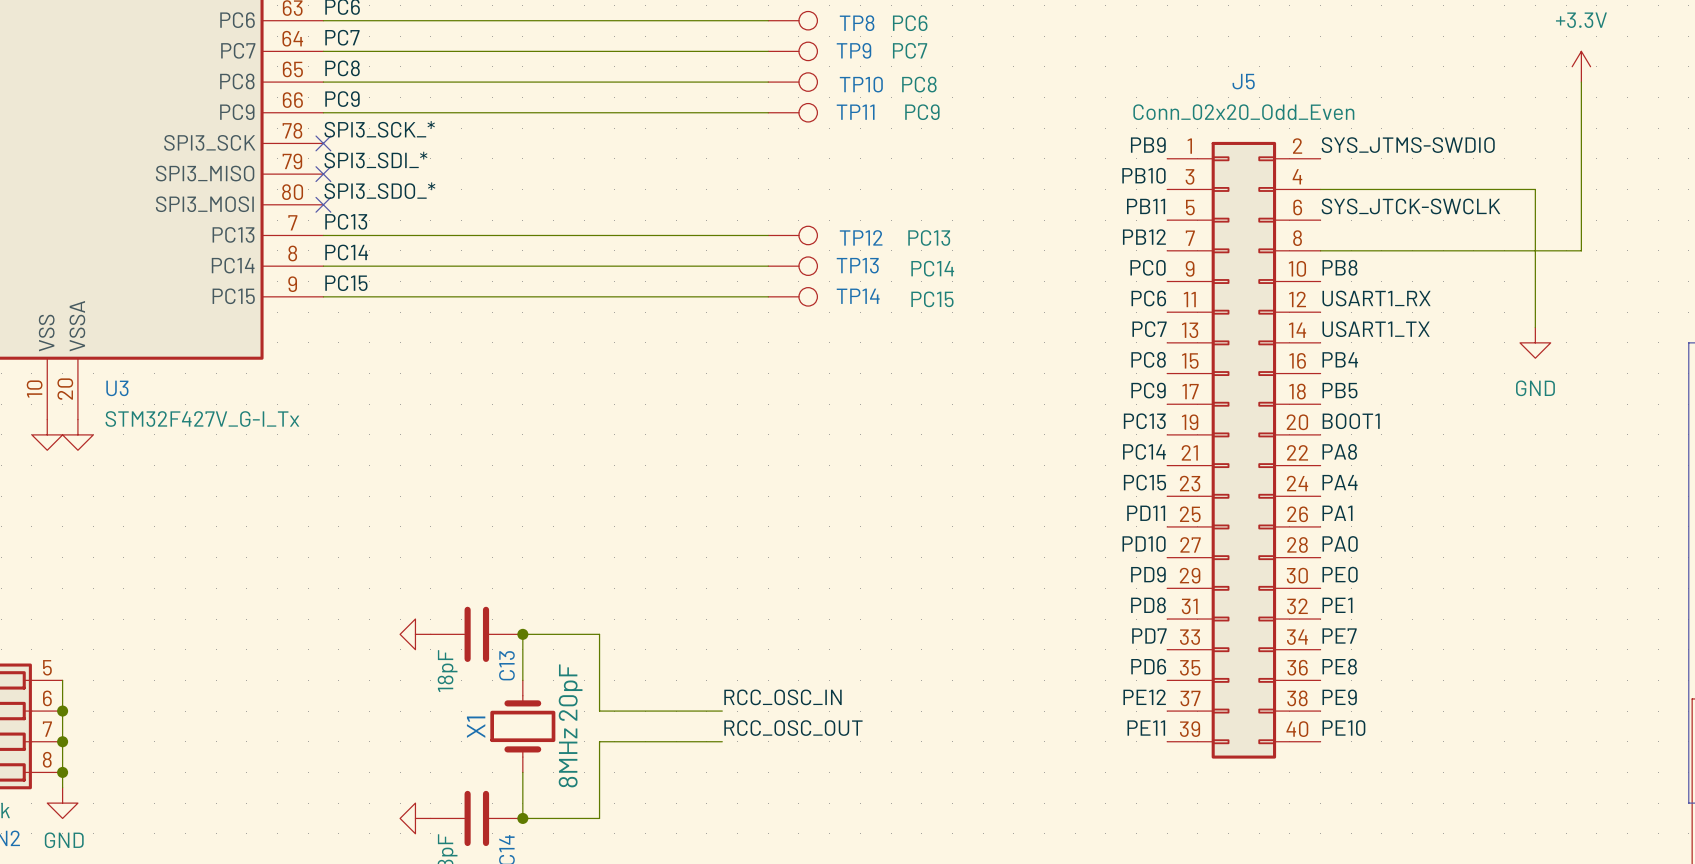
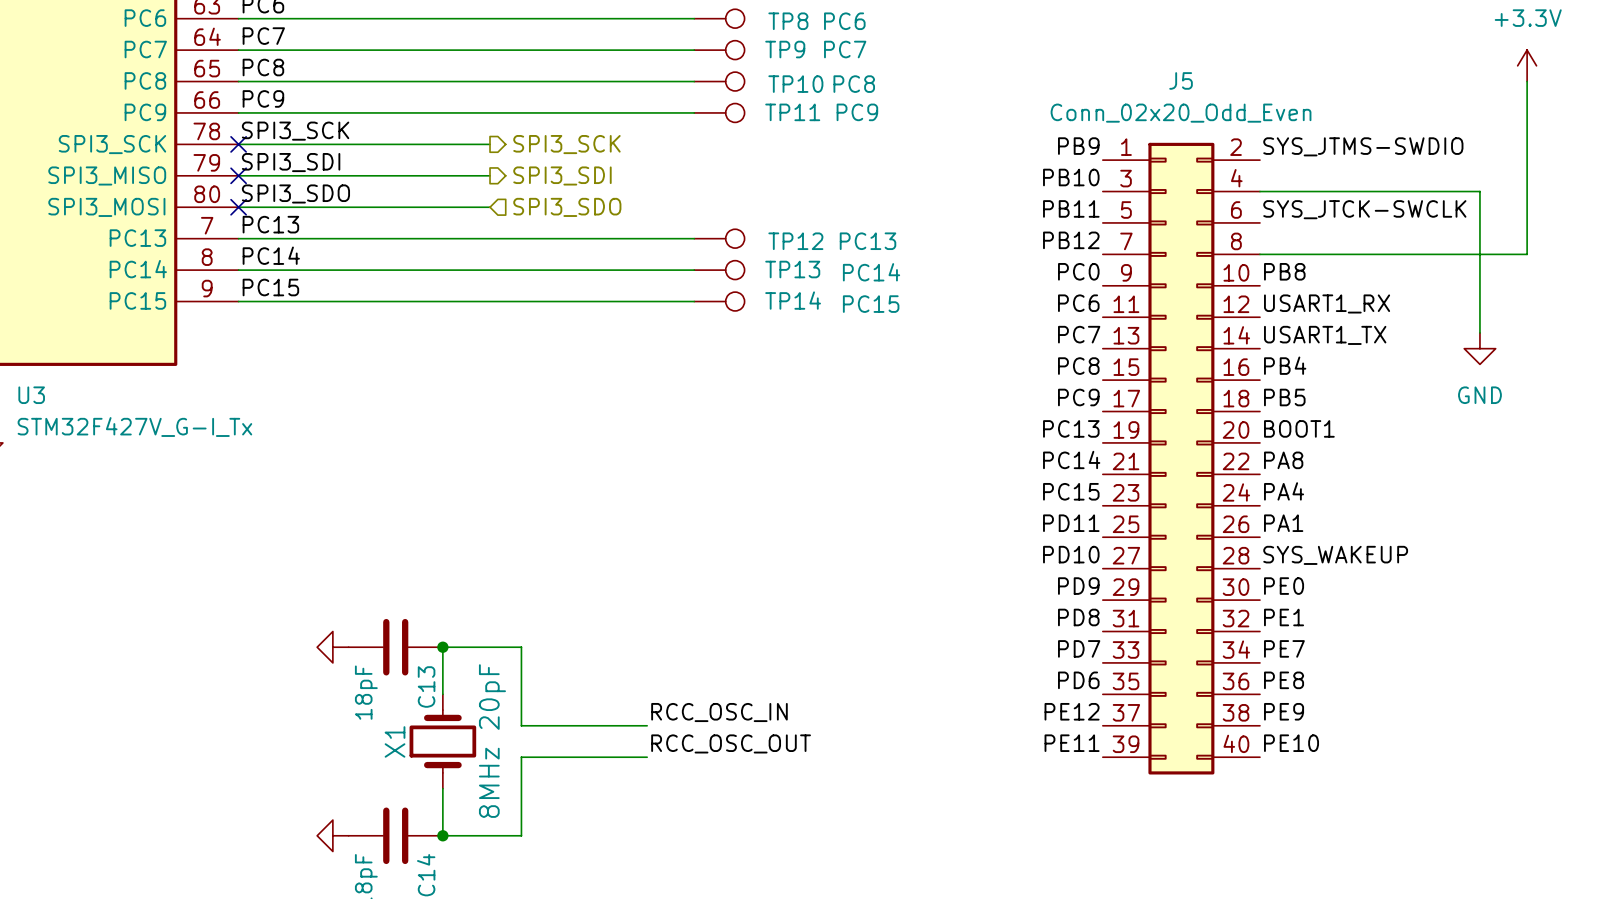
label: SPI3_SCK_* (379, 129) -> SPI3_SCK (295, 131)
hierarchical label: none -> SPI3_SCK (566, 144)
wire: none -> (238, 144) (490, 144)
label: SPI3_SDI_* (375, 160) -> SPI3_SDI (291, 162)
hierarchical label: none -> SPI3_SDI (562, 175)
wire: none -> (238, 175) (490, 175)
label: SPI3_SDO_* (379, 190) -> SPI3_SDO (295, 193)
wire: none -> (238, 207) (490, 207)
hierarchical label: none -> SPI3_SDO (567, 207)
label: PA0 (1340, 543) -> SYS_WAKEUP (1335, 555)

